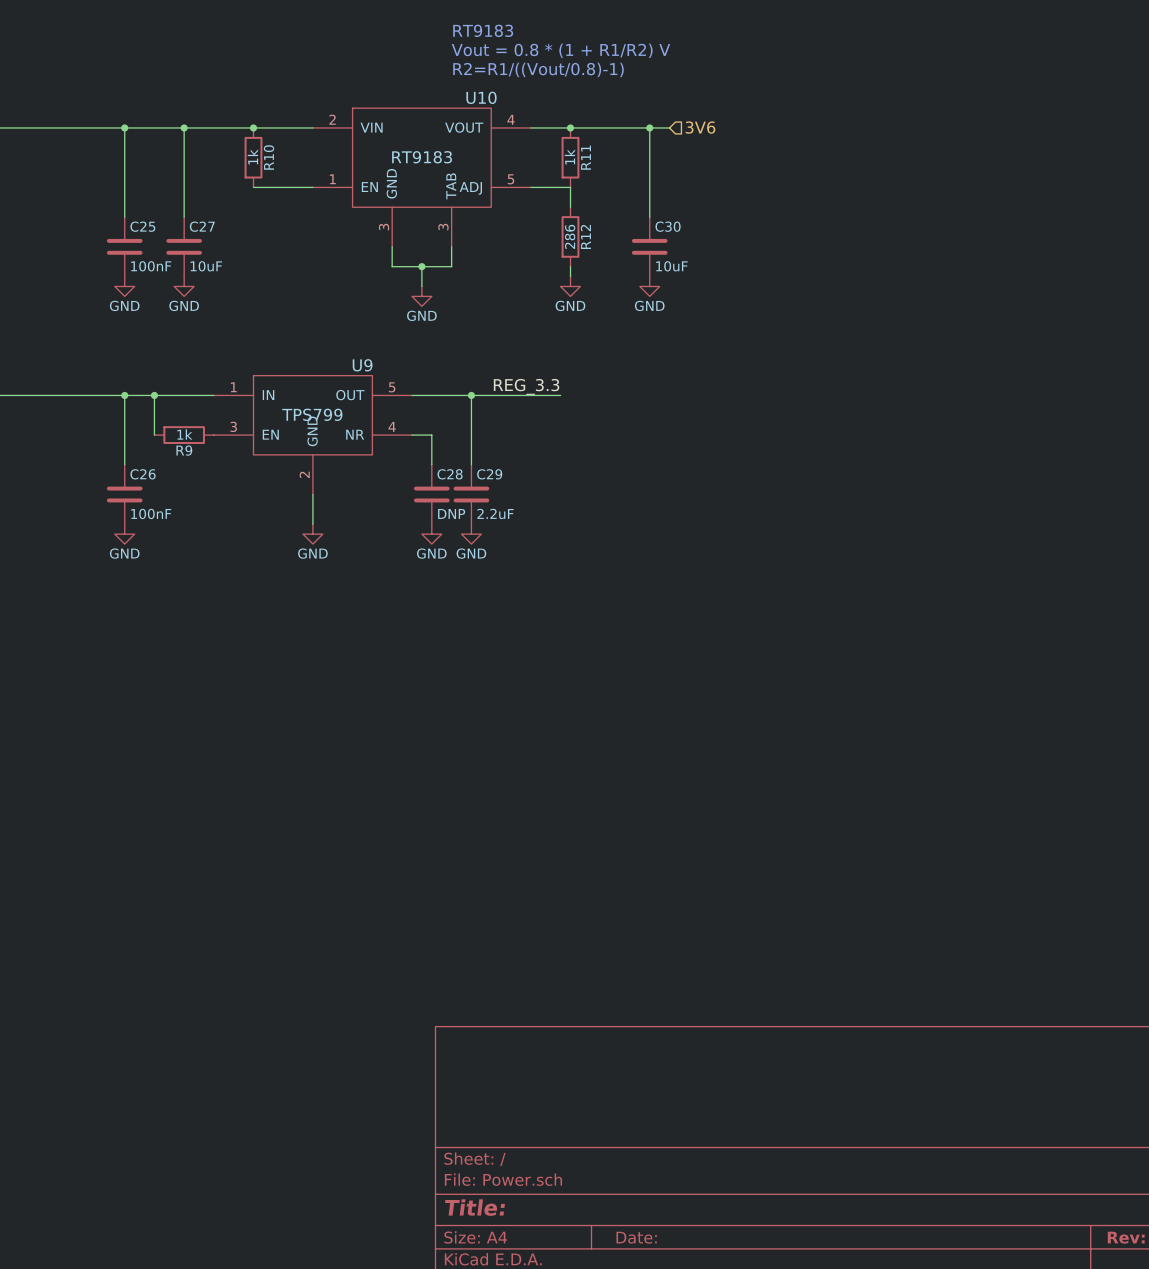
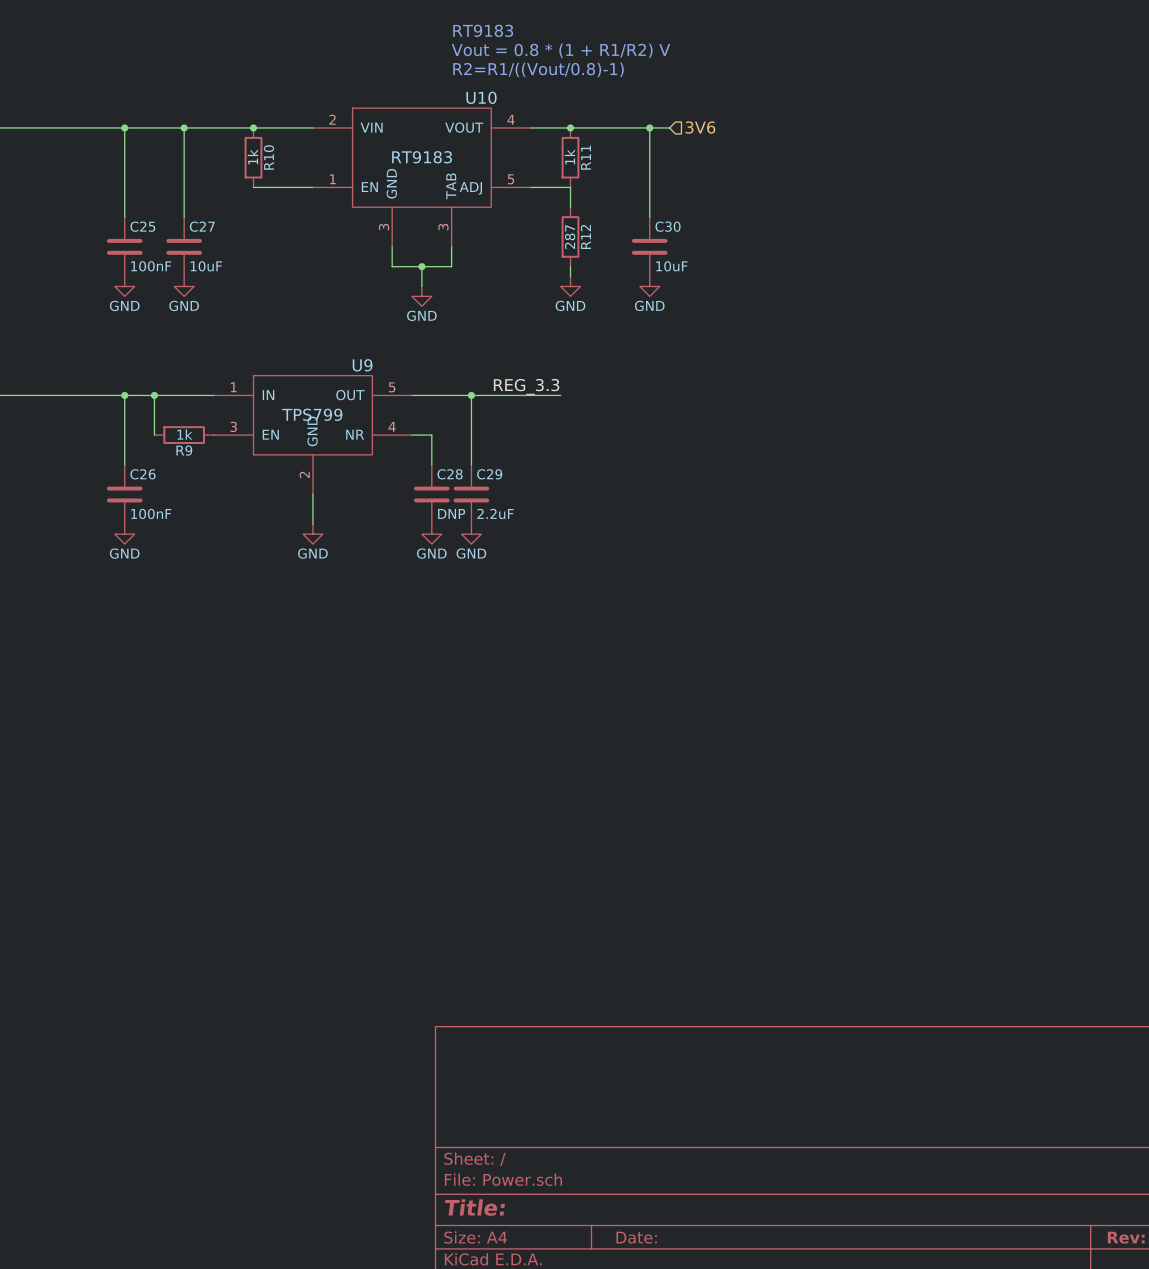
R12 value: 286 (570, 236) -> 287 (570, 237)

